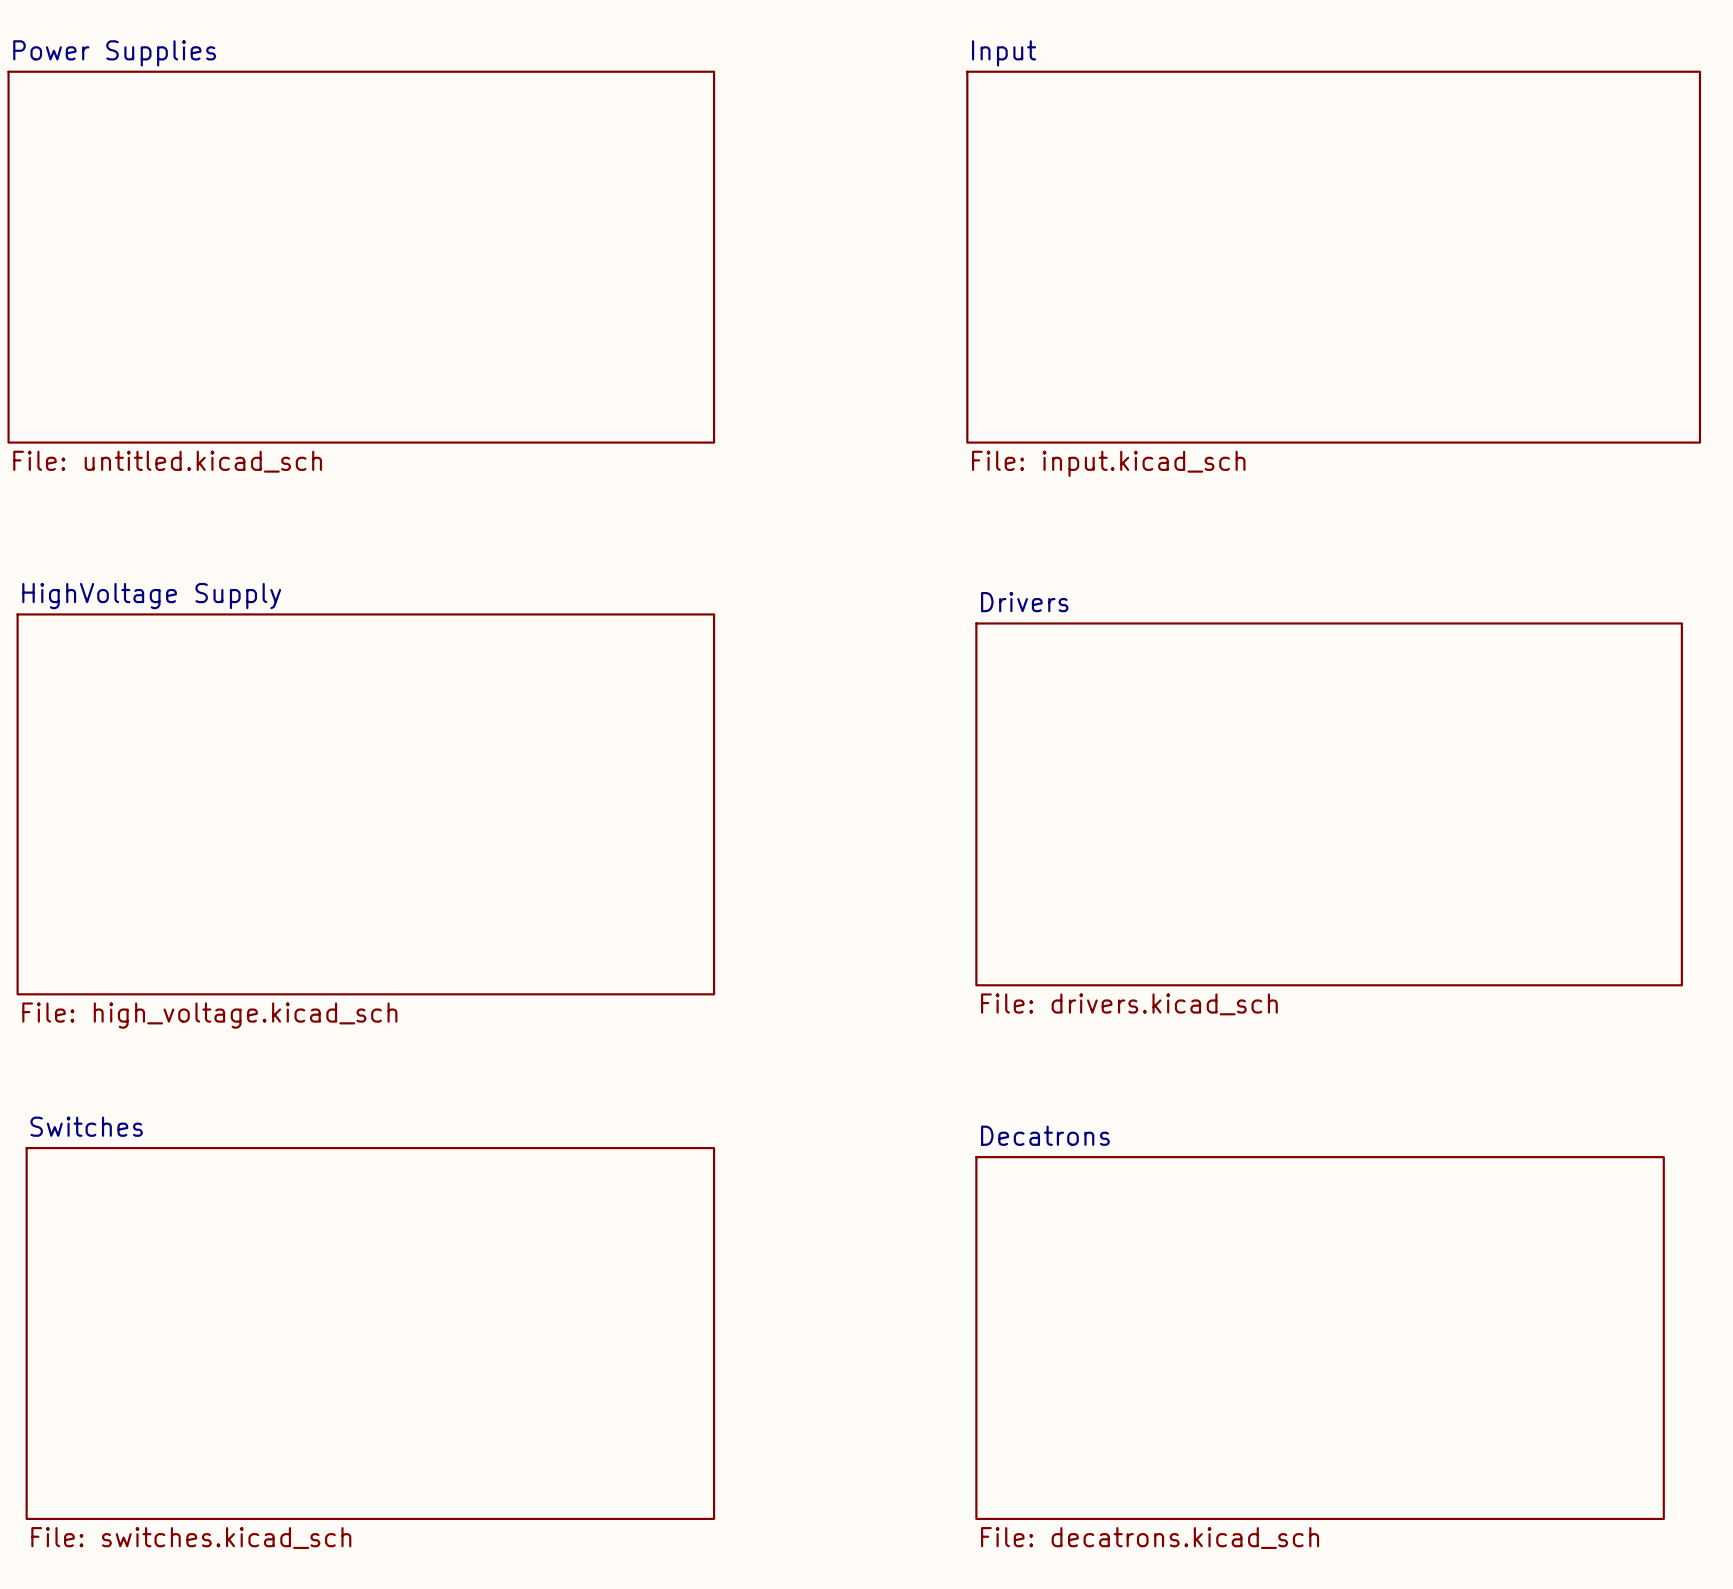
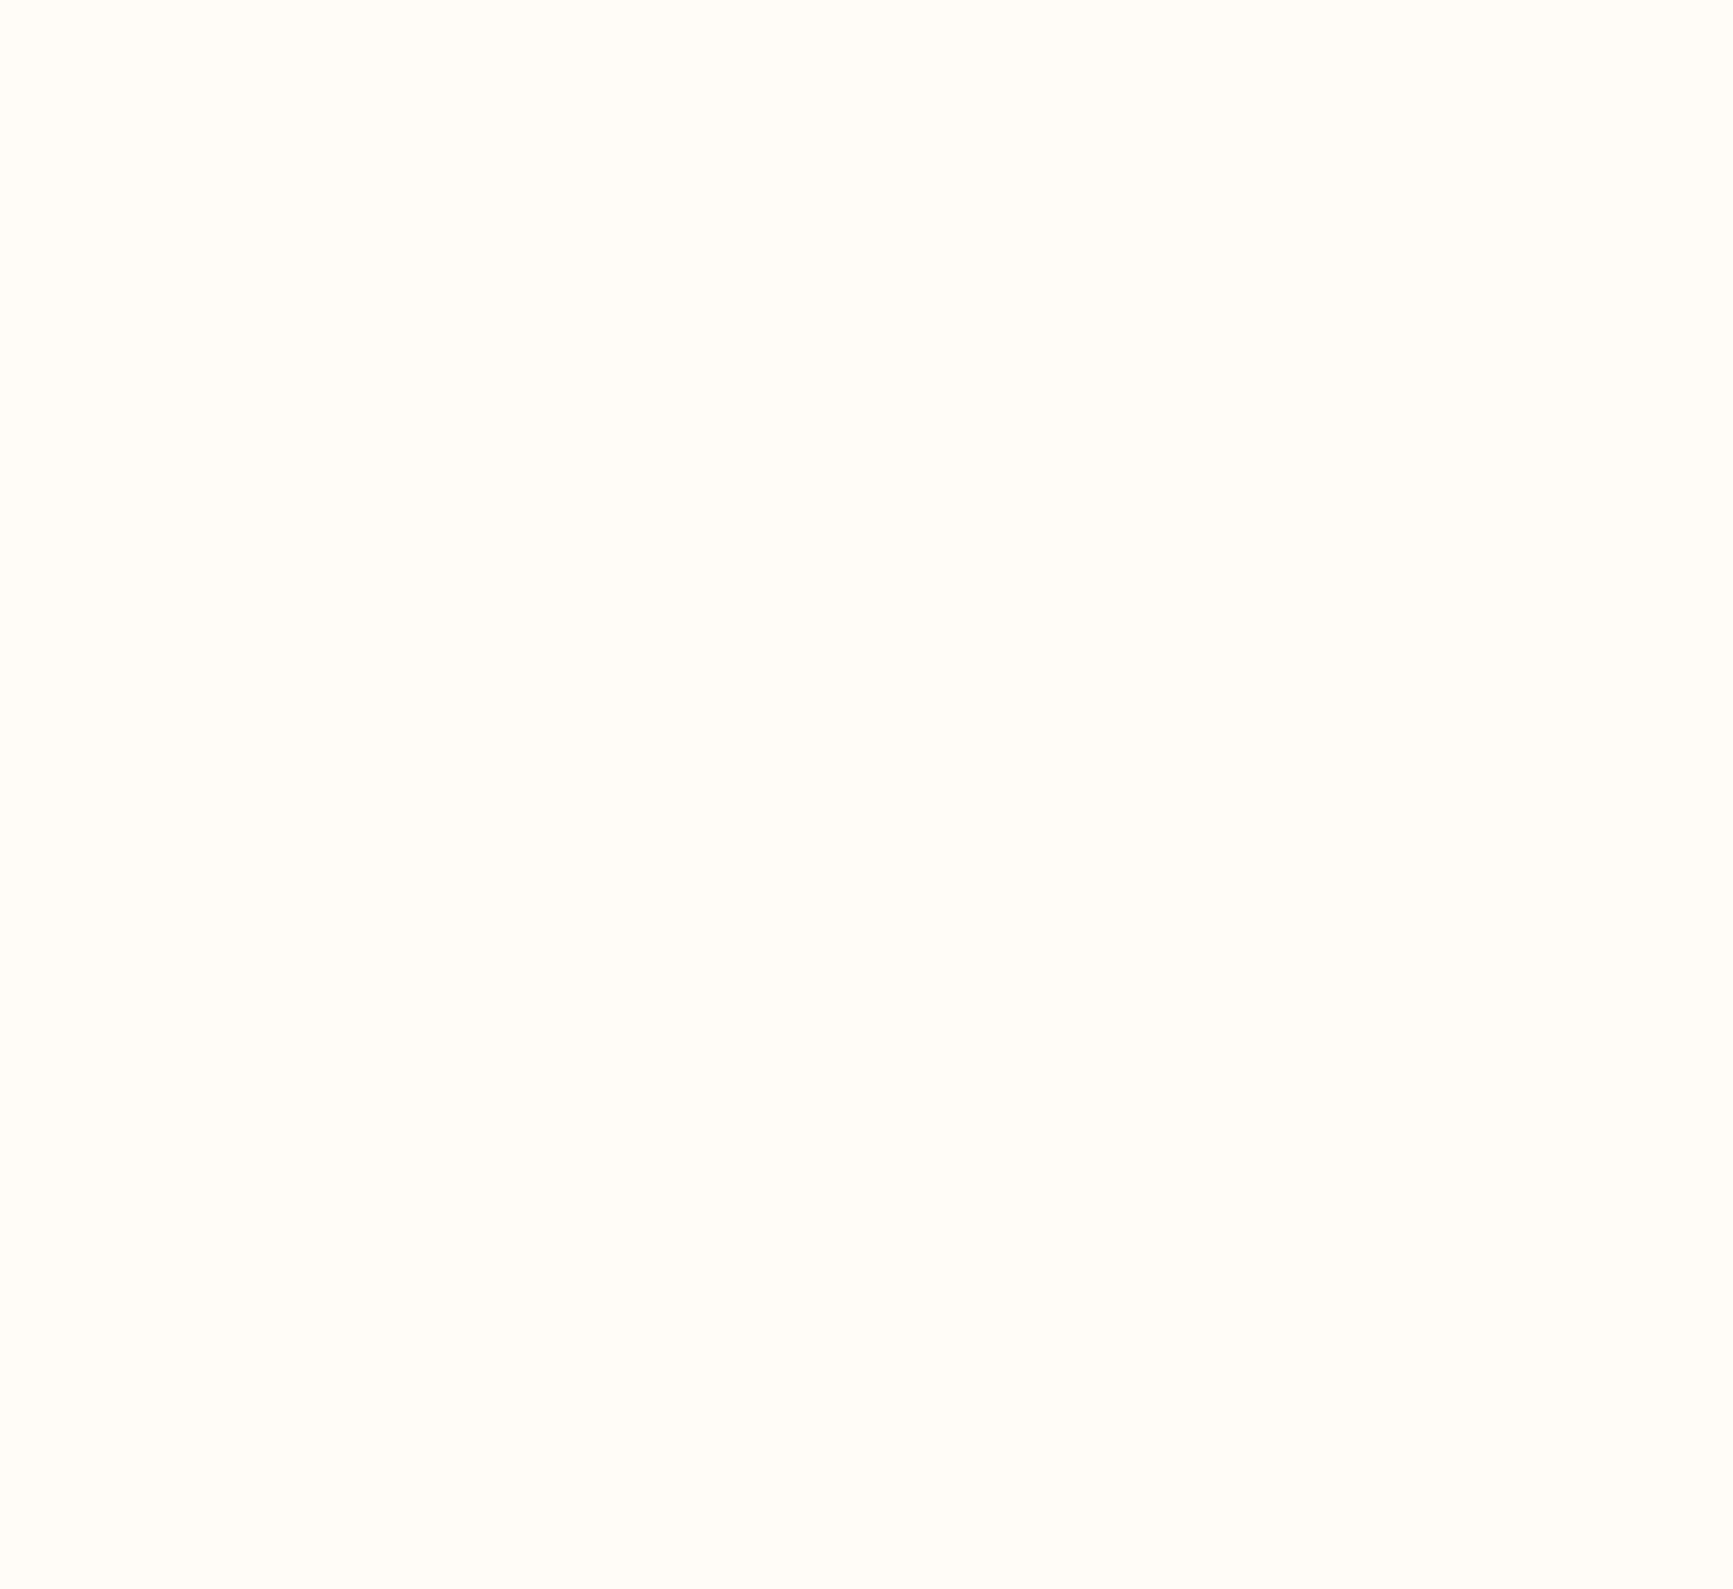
sheet Power Supplies: File: untitled.kicad_sch (361, 257) -> none
sheet Input: File: input.kicad_sch (1333, 257) -> none
sheet HighVoltage Supply: File: high_voltage.kicad_sch (365, 804) -> none
sheet Drivers: File: drivers.kicad_sch (1329, 804) -> none
sheet Switches: File: switches.kicad_sch (370, 1333) -> none
sheet Decatrons: File: decatrons.kicad_sch (1320, 1338) -> none

